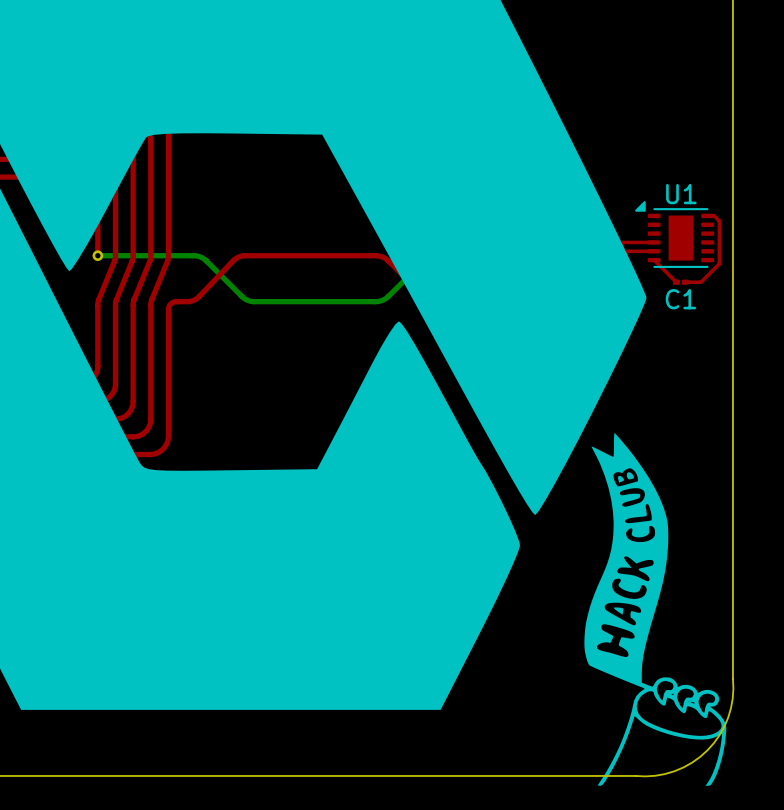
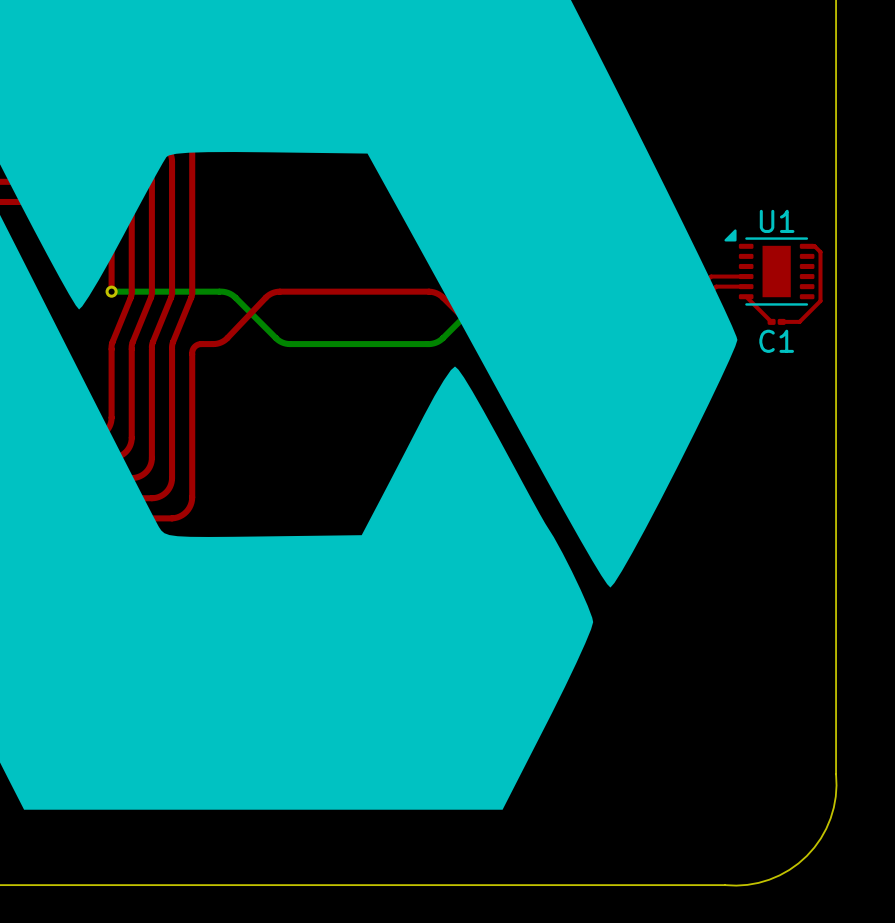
drawing: [584, 433, 727, 786] -> none

